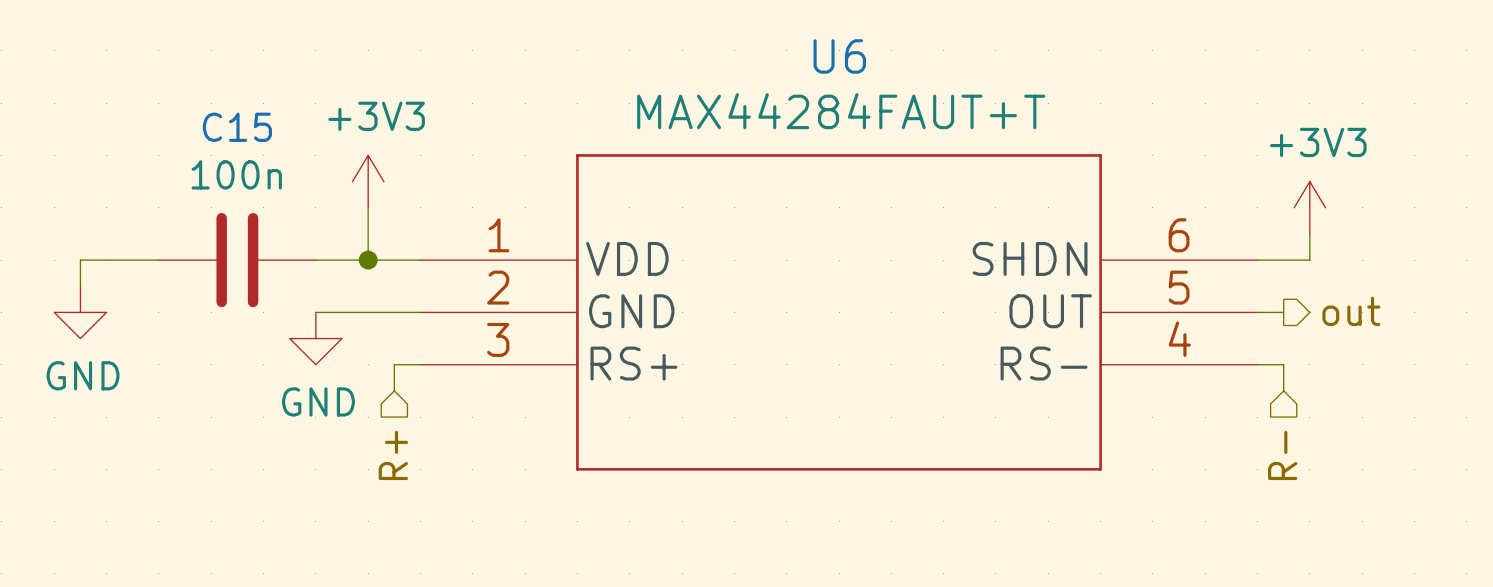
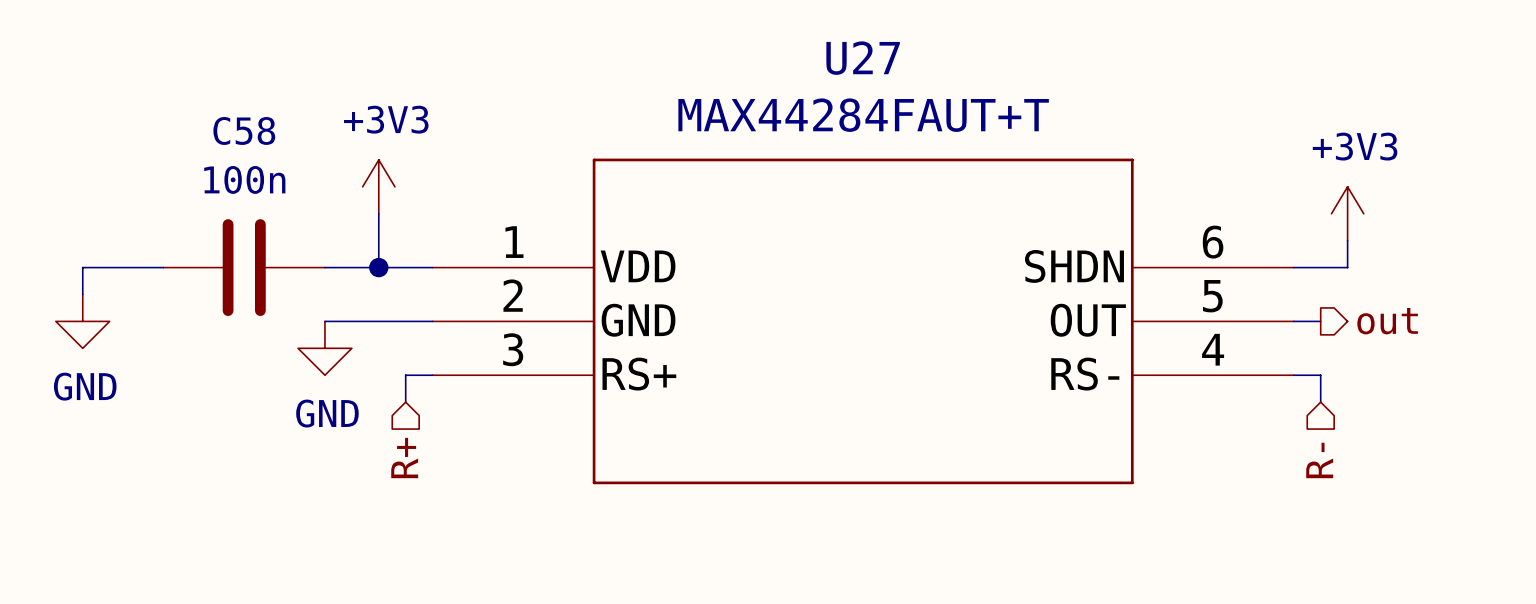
U6 name: U6 (839, 56) -> U27 (863, 58)
C15 name: C15 (237, 127) -> C58 (244, 130)

